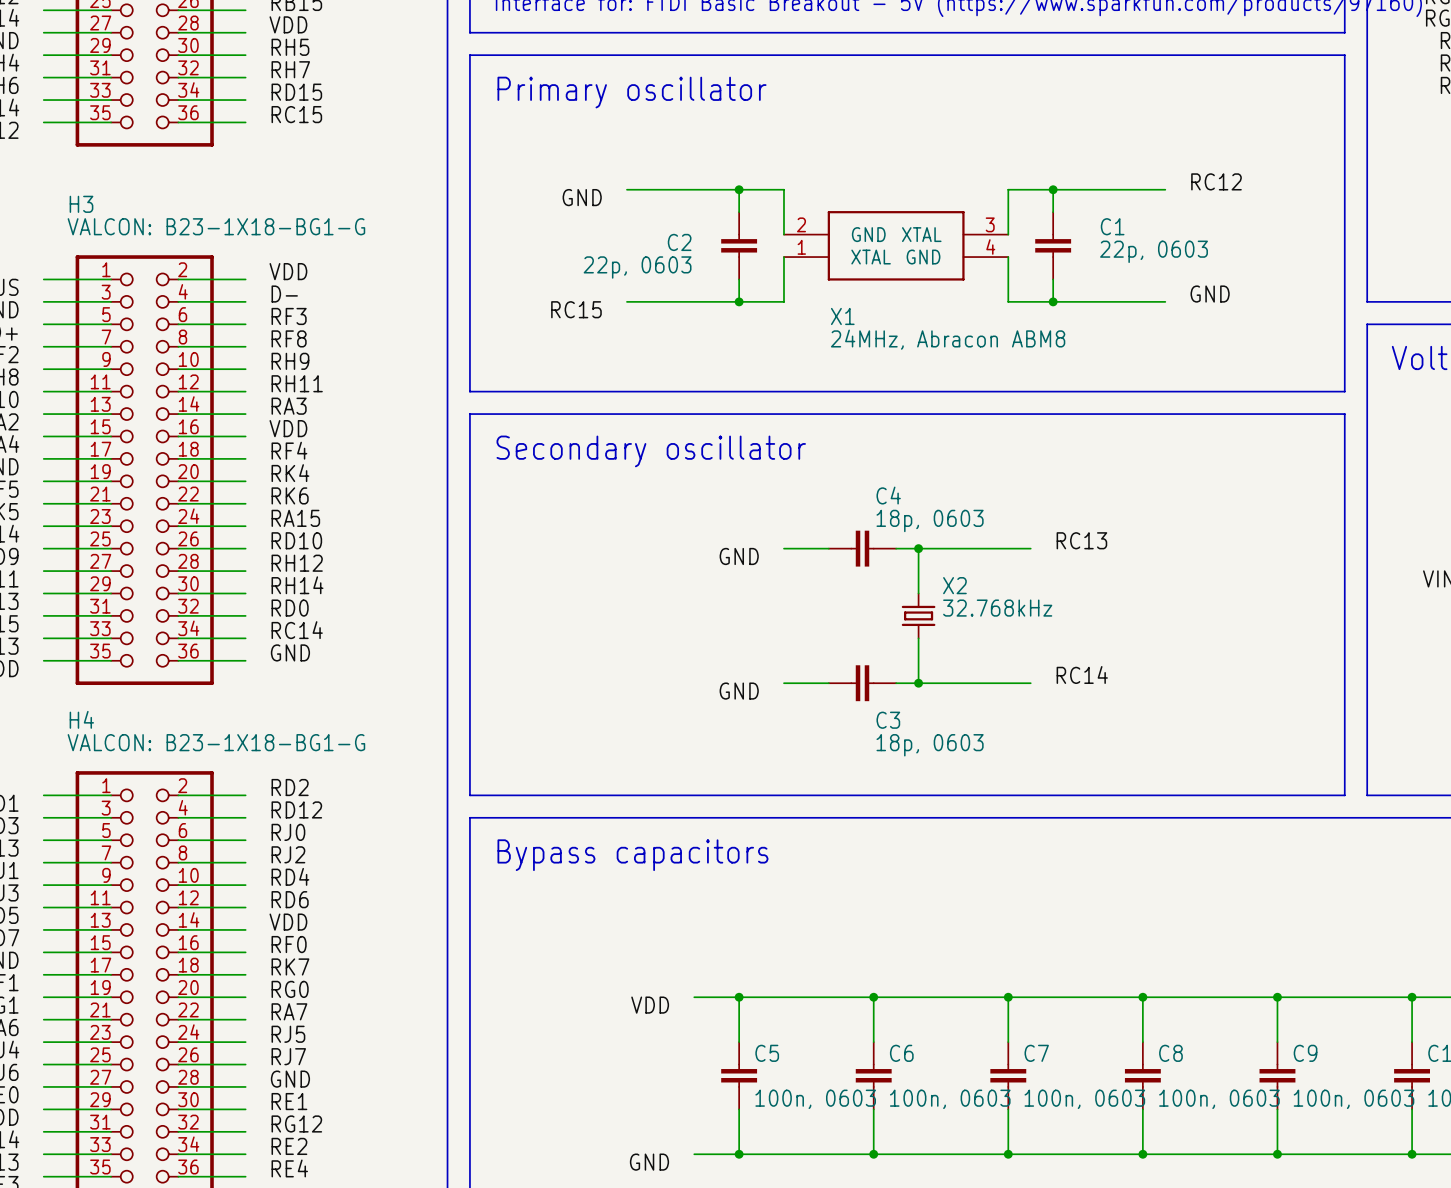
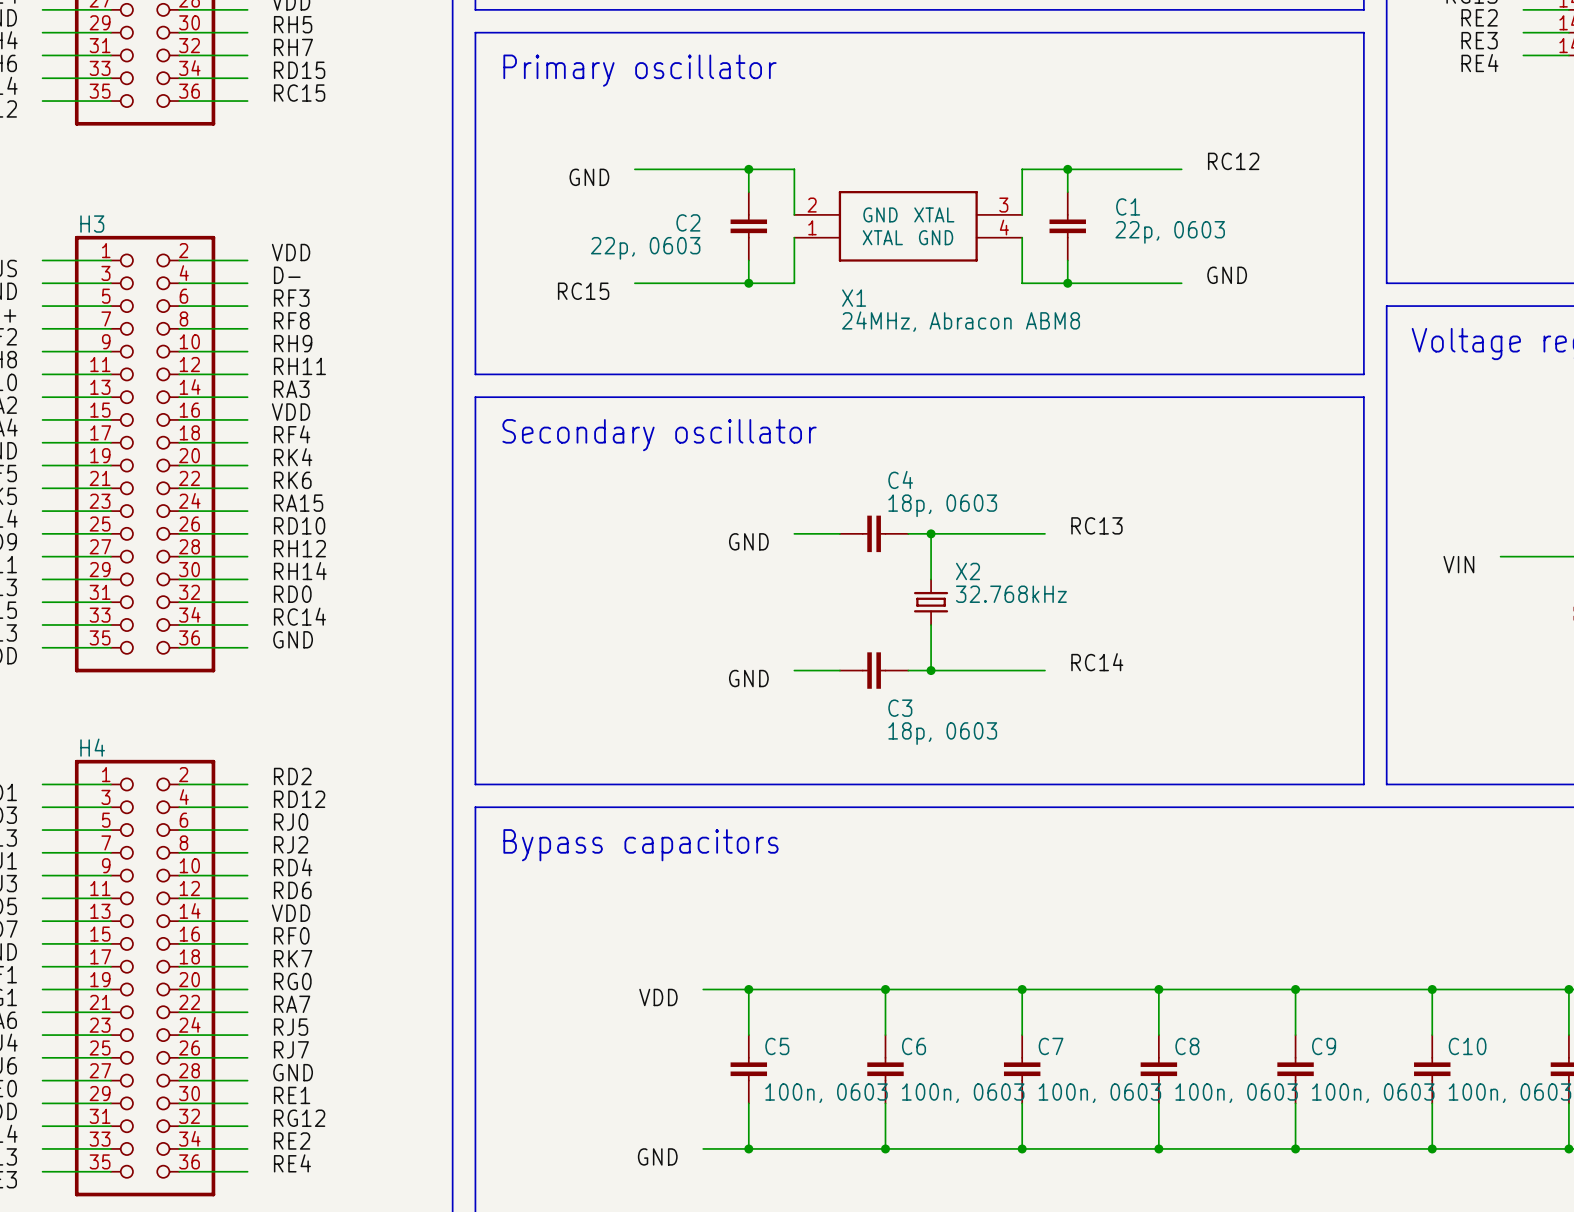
H3 name position: H3 (81, 204) -> H3 (92, 224)
H3 value: VALCON: B23-1X18-BG1-G (216, 226) -> none
H4 name position: H4 (81, 719) -> H4 (92, 747)
H4 value: VALCON: B23-1X18-BG1-G (216, 742) -> none

